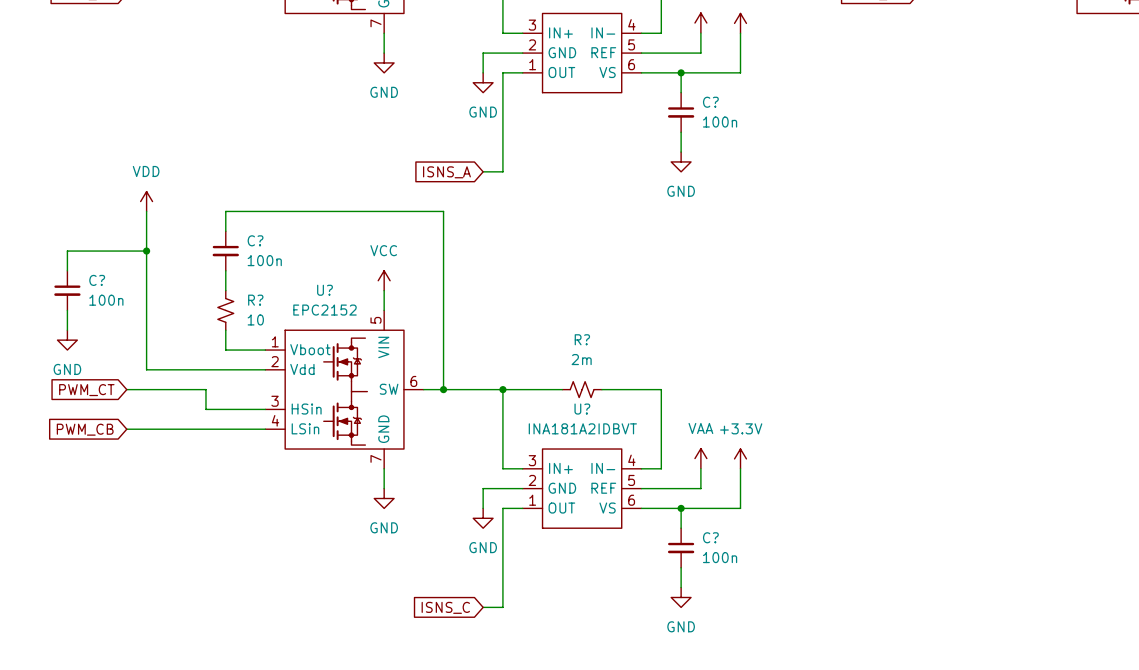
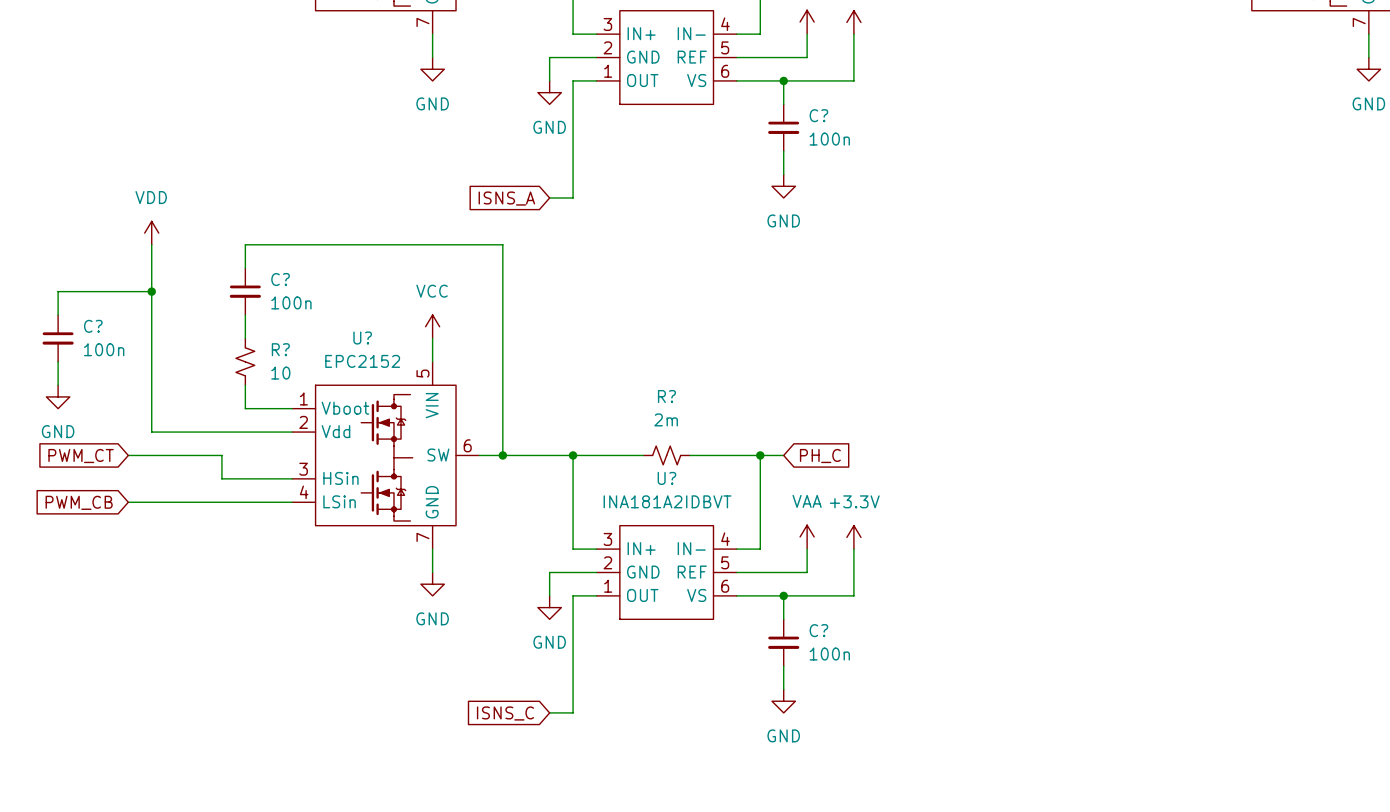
wire: none -> (760, 455) (783, 455)
junction: none -> (760, 455)
global label: none -> PH_C (820, 456)

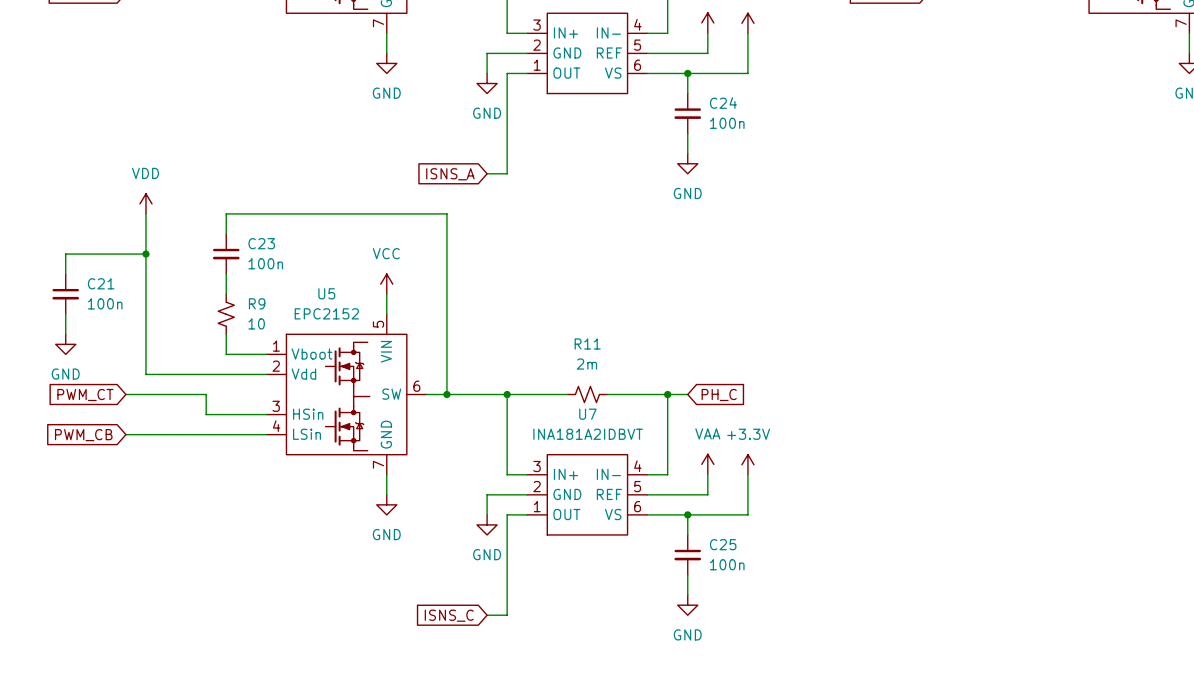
C? name: C? (818, 115) -> C24 (723, 102)
C? name: C? (280, 279) -> C23 (261, 243)
C? name: C? (93, 326) -> C21 (101, 283)
U? name: U? (362, 337) -> U5 (326, 293)
R? name: R? (280, 349) -> R9 (257, 303)
R? name: R? (666, 396) -> R11 (587, 343)
U? name: U? (666, 478) -> U7 (587, 414)
C? name: C? (818, 630) -> C25 (723, 544)

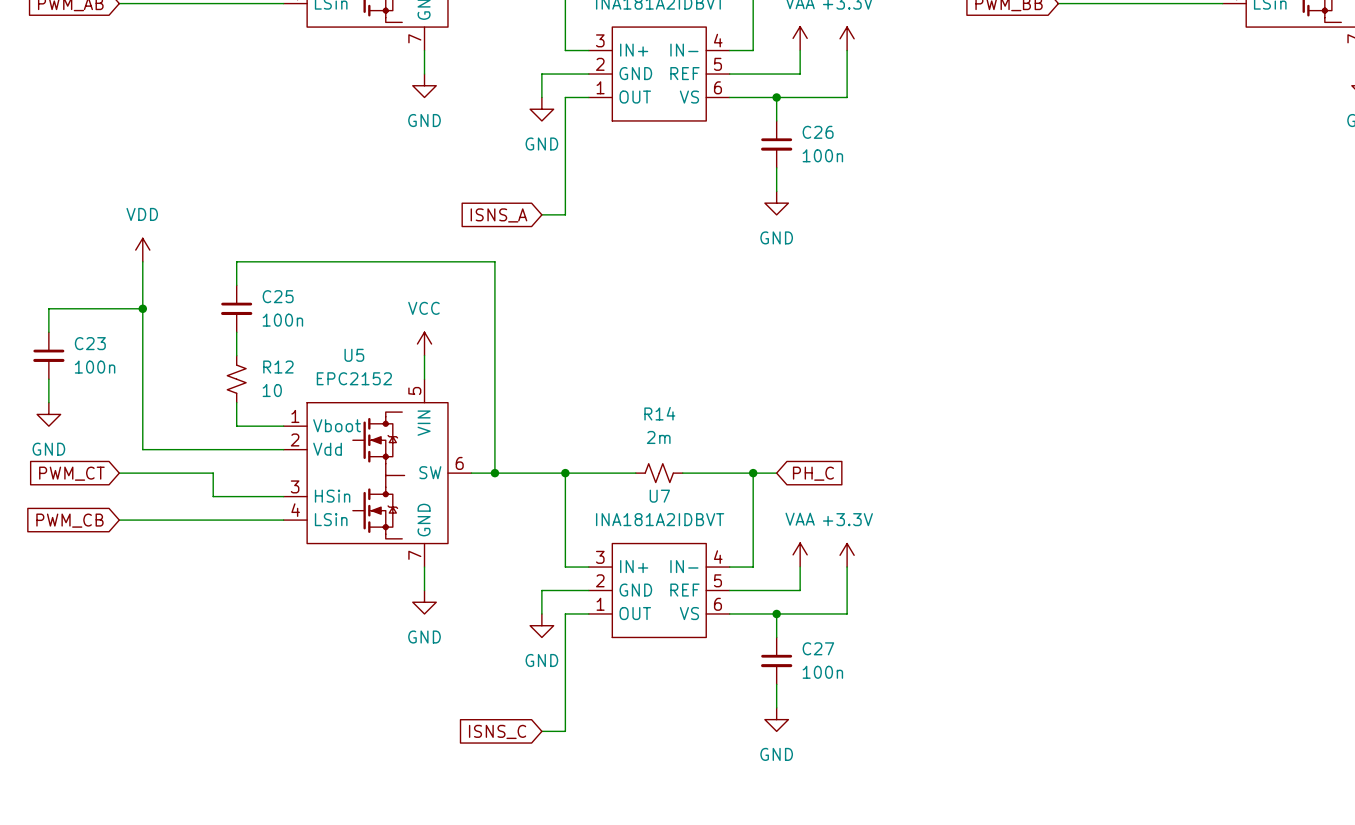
C24 name: C24 (723, 102) -> C26 (818, 132)
C23 name: C23 (261, 243) -> C25 (278, 296)
C21 name: C21 (101, 283) -> C23 (90, 343)
R9 name: R9 (257, 303) -> R12 (278, 367)
R11 name: R11 (587, 343) -> R14 (659, 413)
C25 name: C25 (723, 544) -> C27 (818, 648)

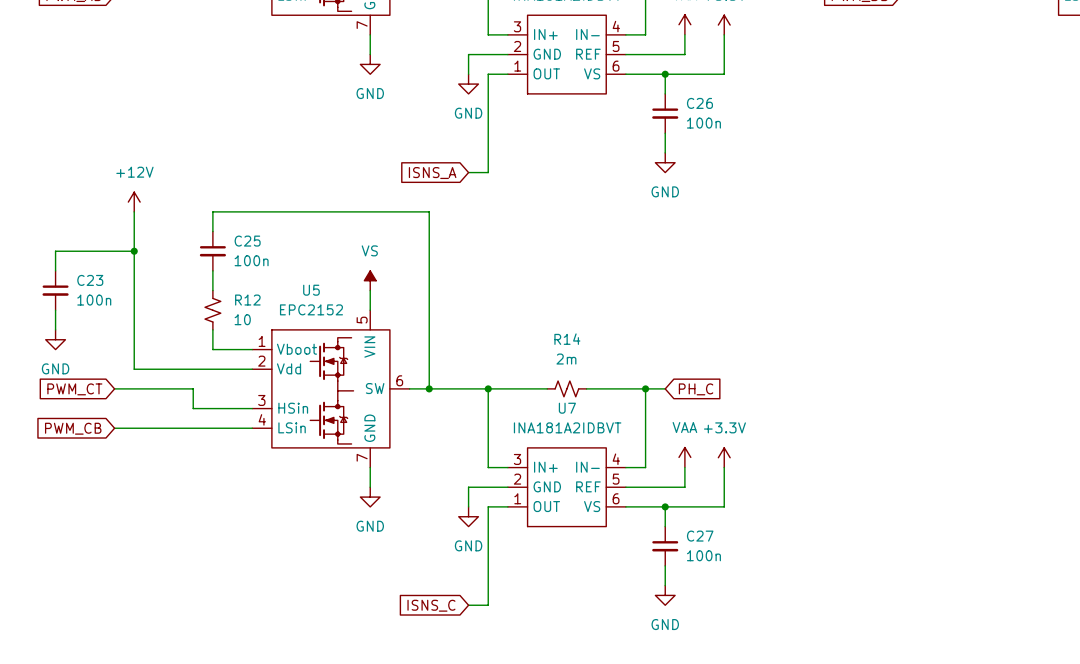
power symbol: VDD (142, 250) -> +12V (134, 202)
power symbol: VCC (424, 344) -> VS (370, 280)

